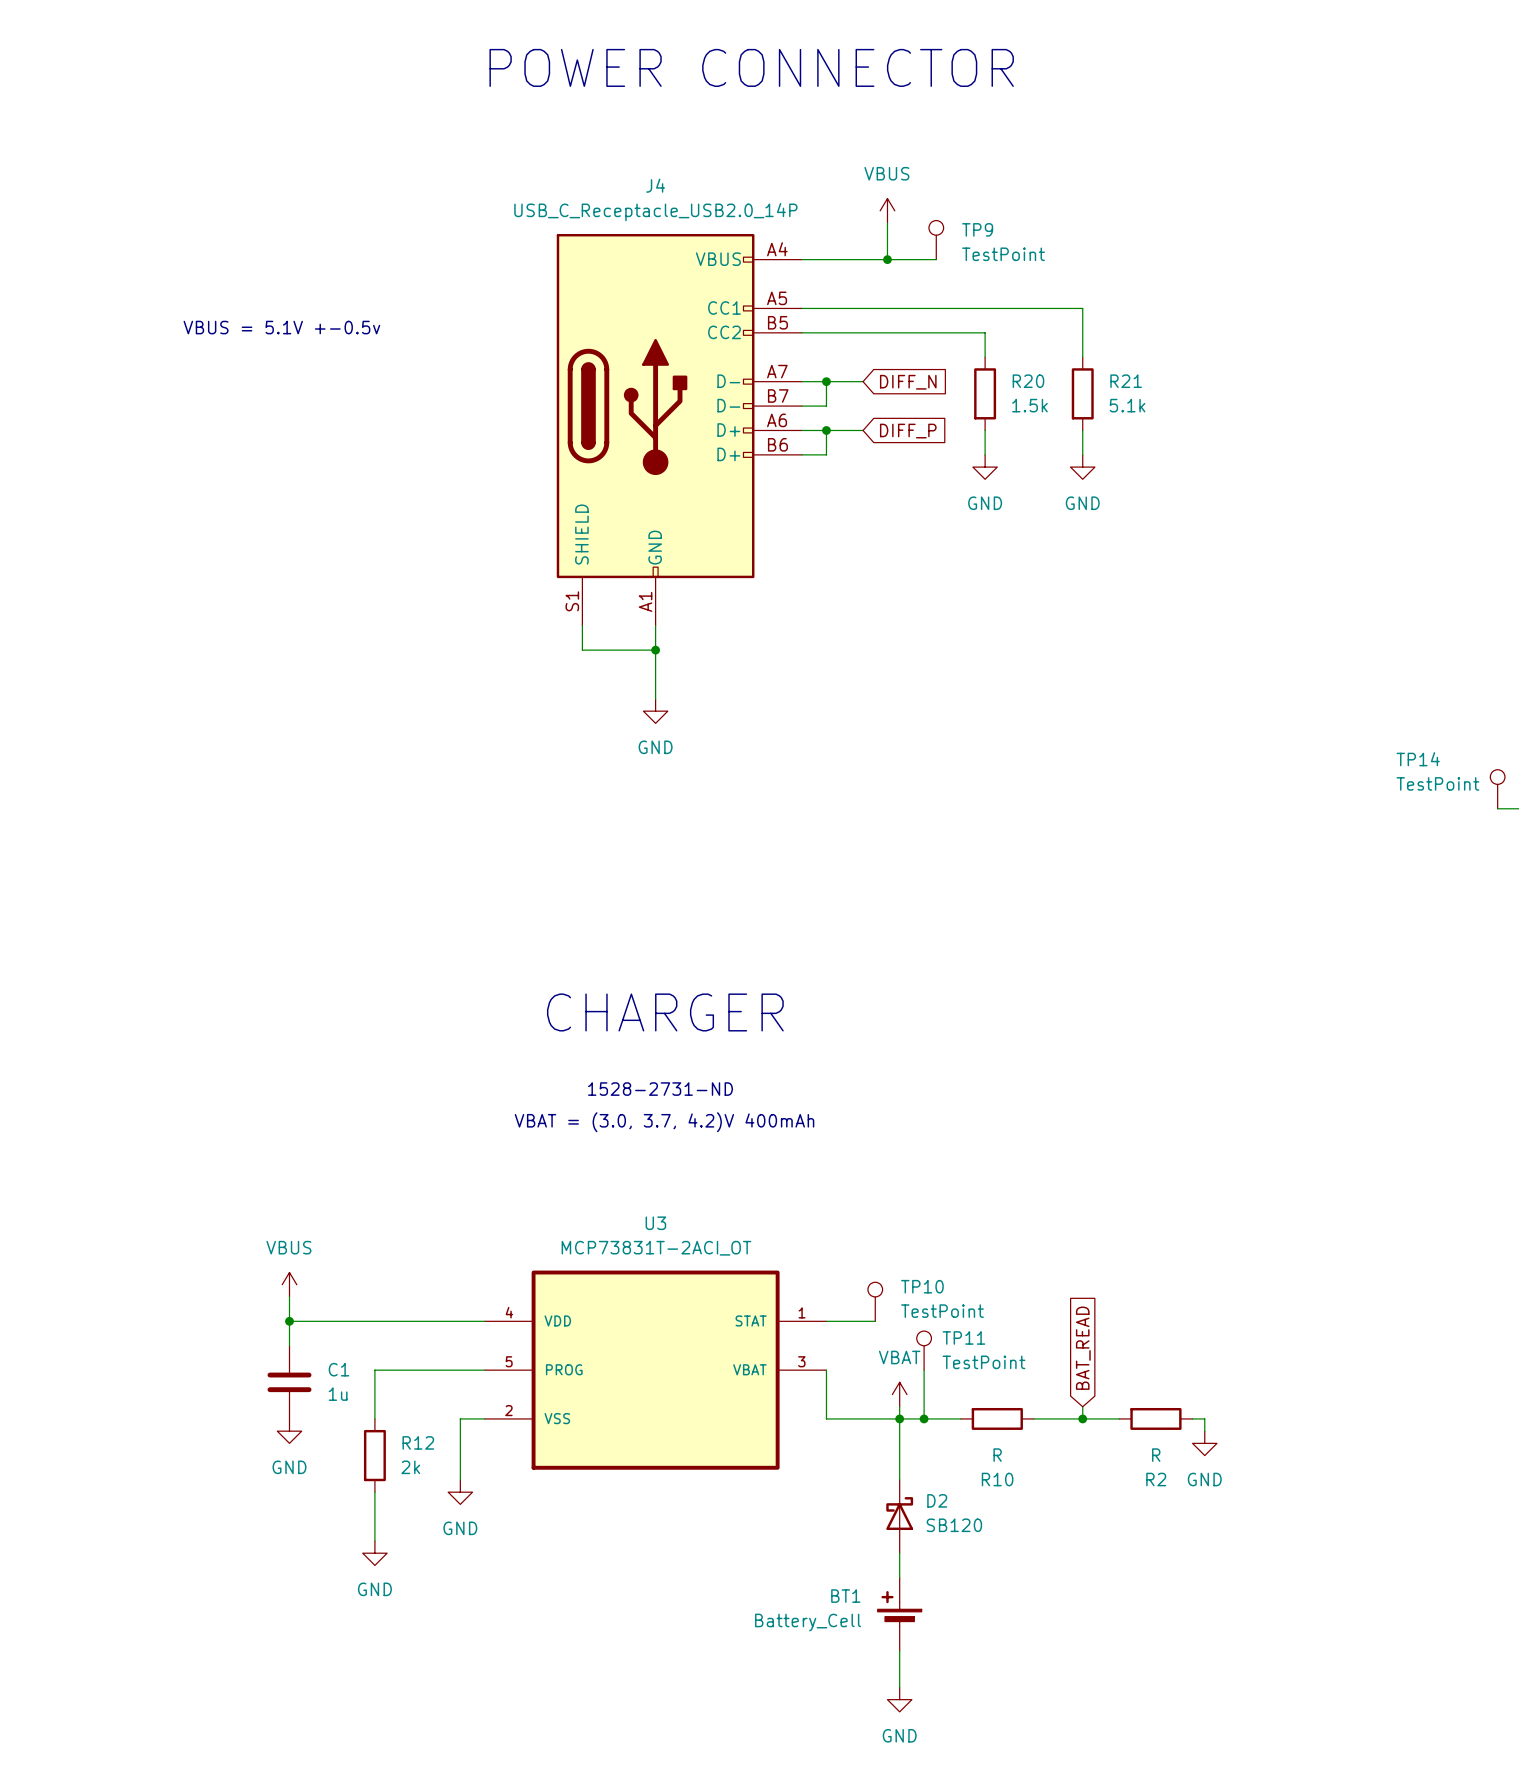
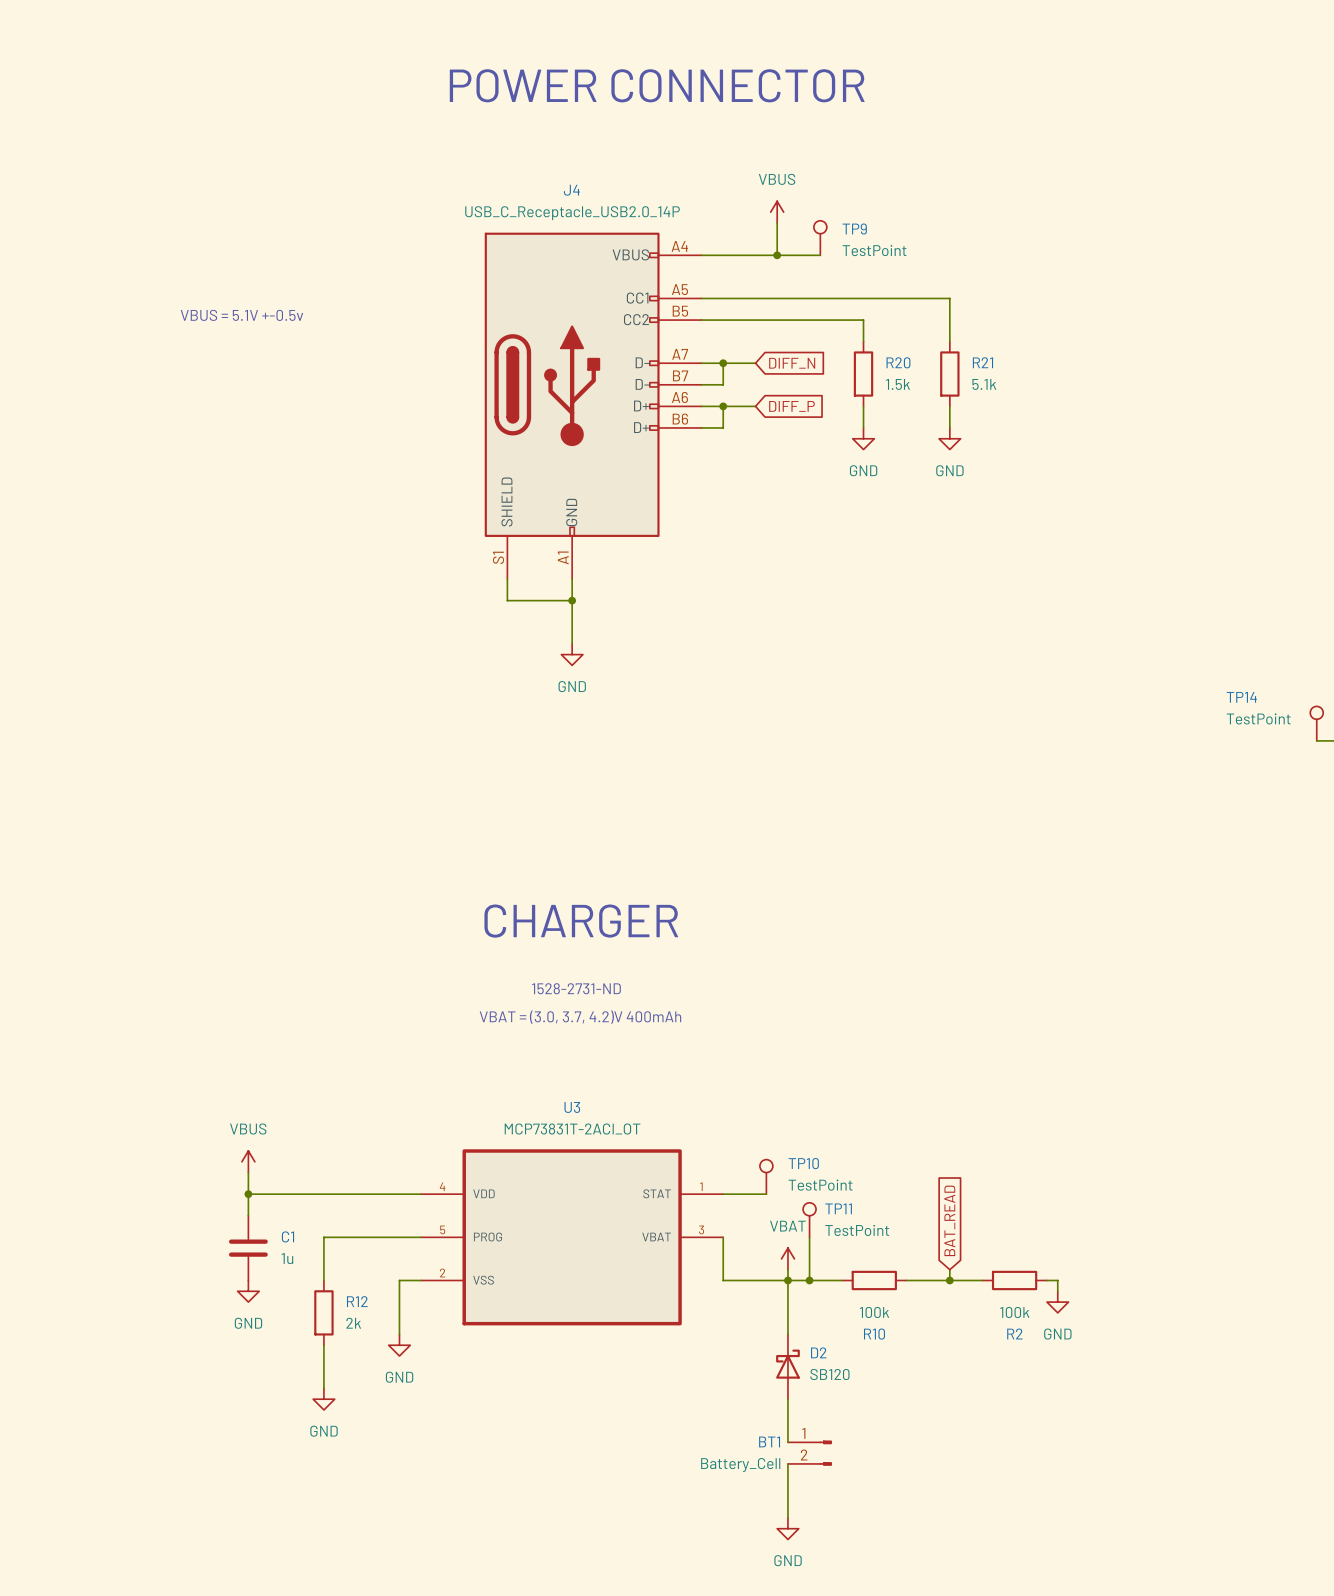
R10 value: R (997, 1455) -> 100k (874, 1312)
R2 value: R (1156, 1455) -> 100k (1014, 1312)
BT1 symbol: [877, 1577, 922, 1651] -> [787, 1440, 832, 1466]

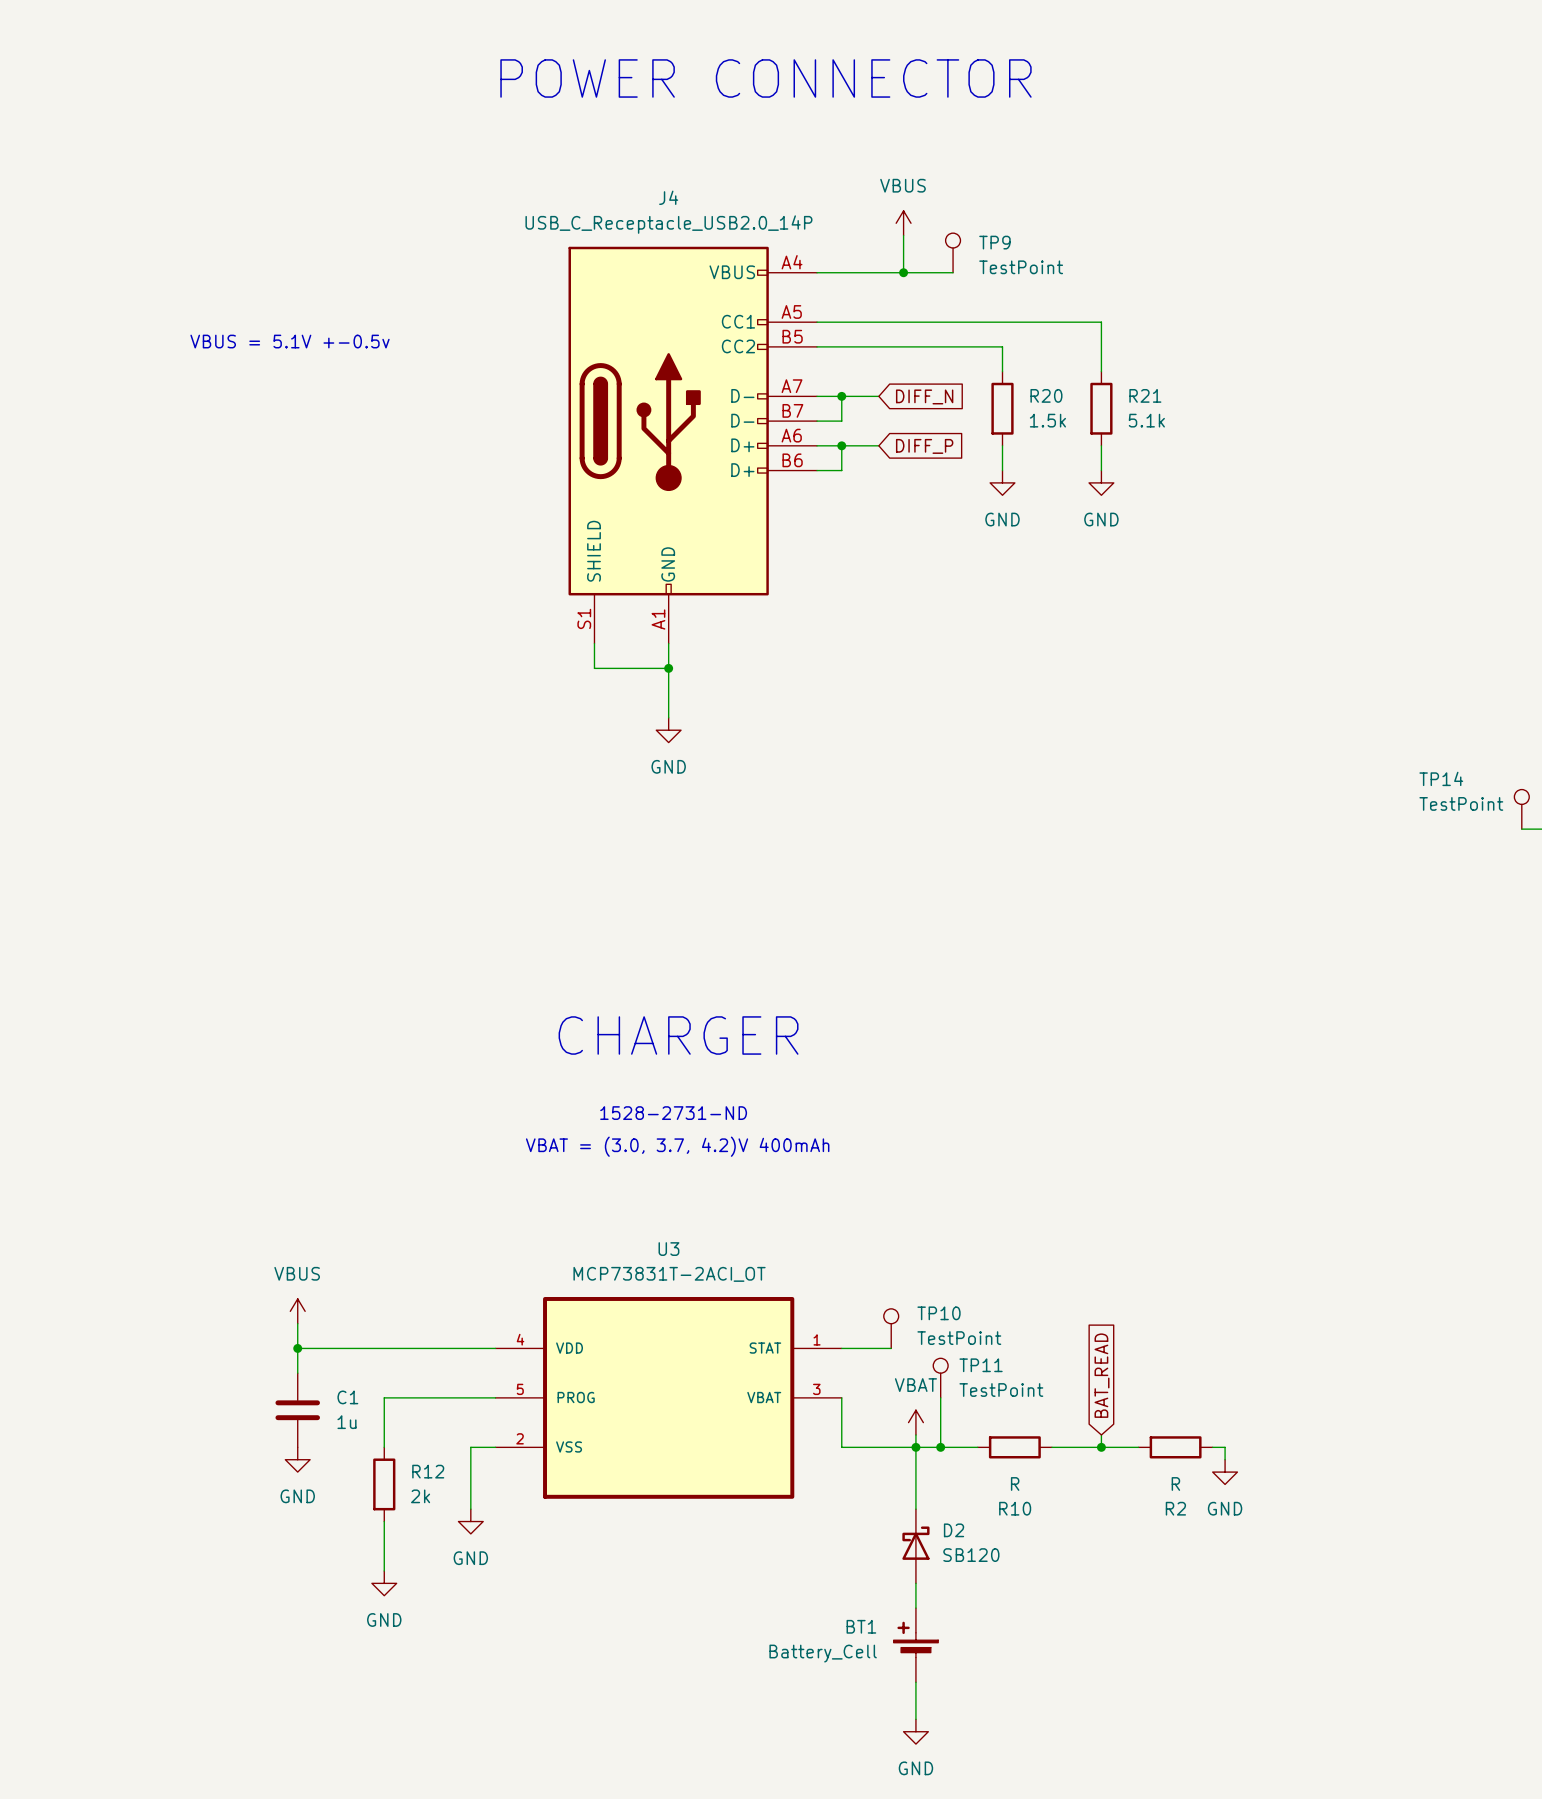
R10 value: 100k (874, 1312) -> R (1015, 1483)
R2 value: 100k (1014, 1312) -> R (1175, 1483)
BT1 symbol: [787, 1440, 832, 1466] -> [893, 1608, 939, 1683]

